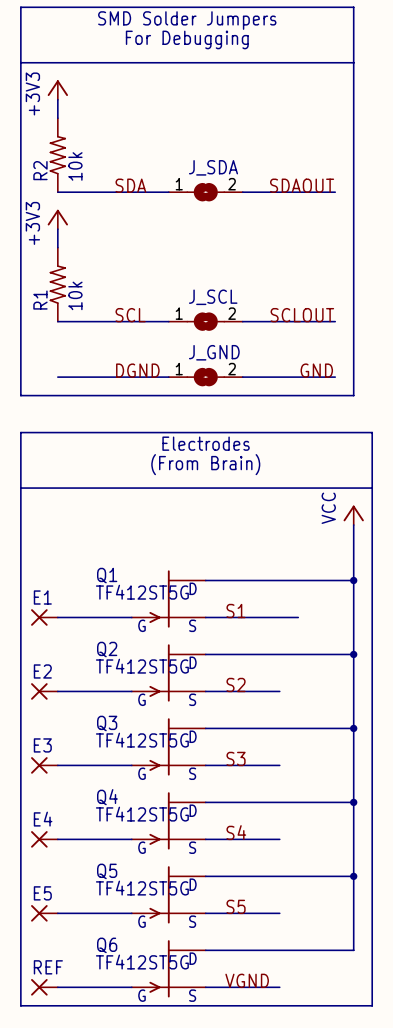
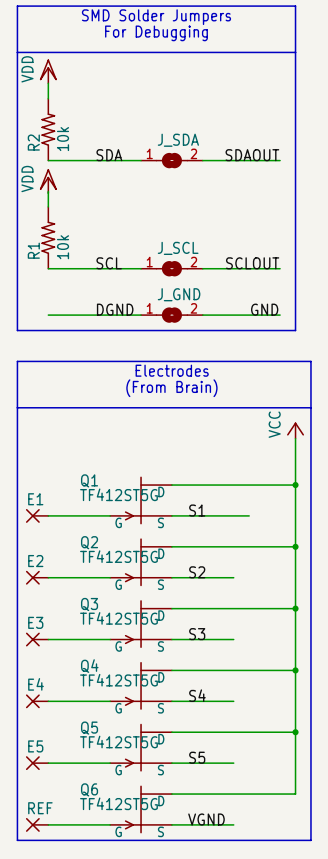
power symbol: +3V3 (57, 90) -> VDD (48, 71)
power symbol: +3V3 (57, 219) -> VDD (48, 181)

